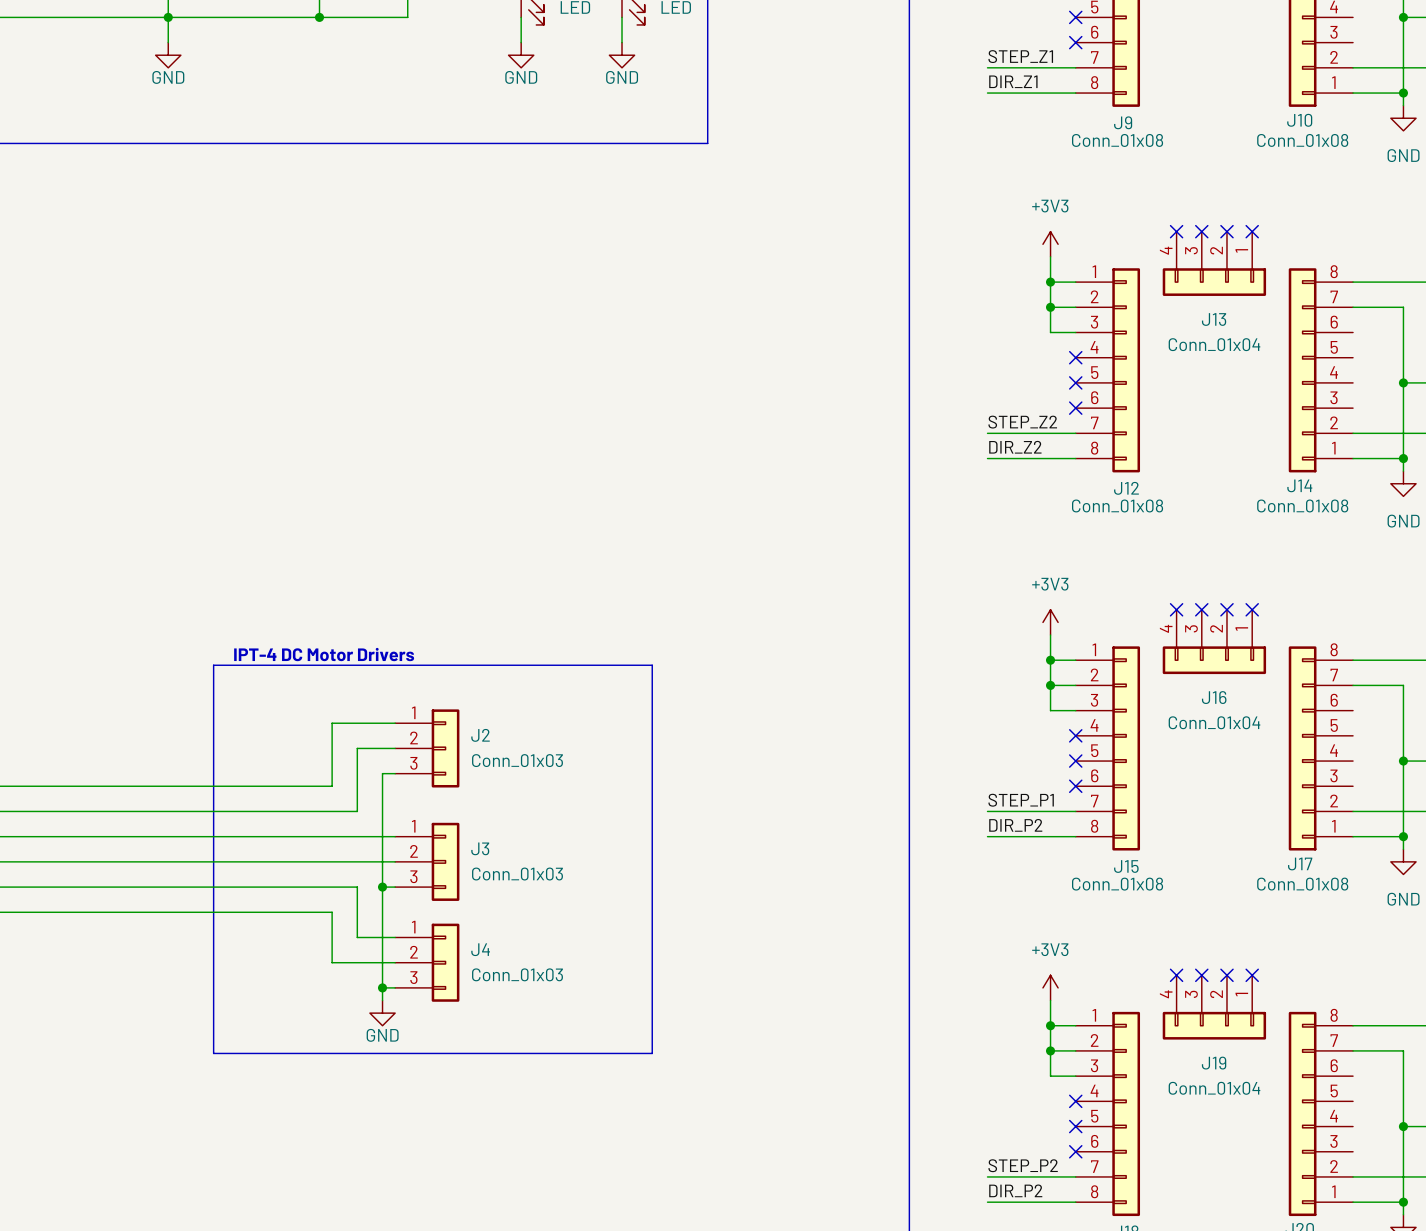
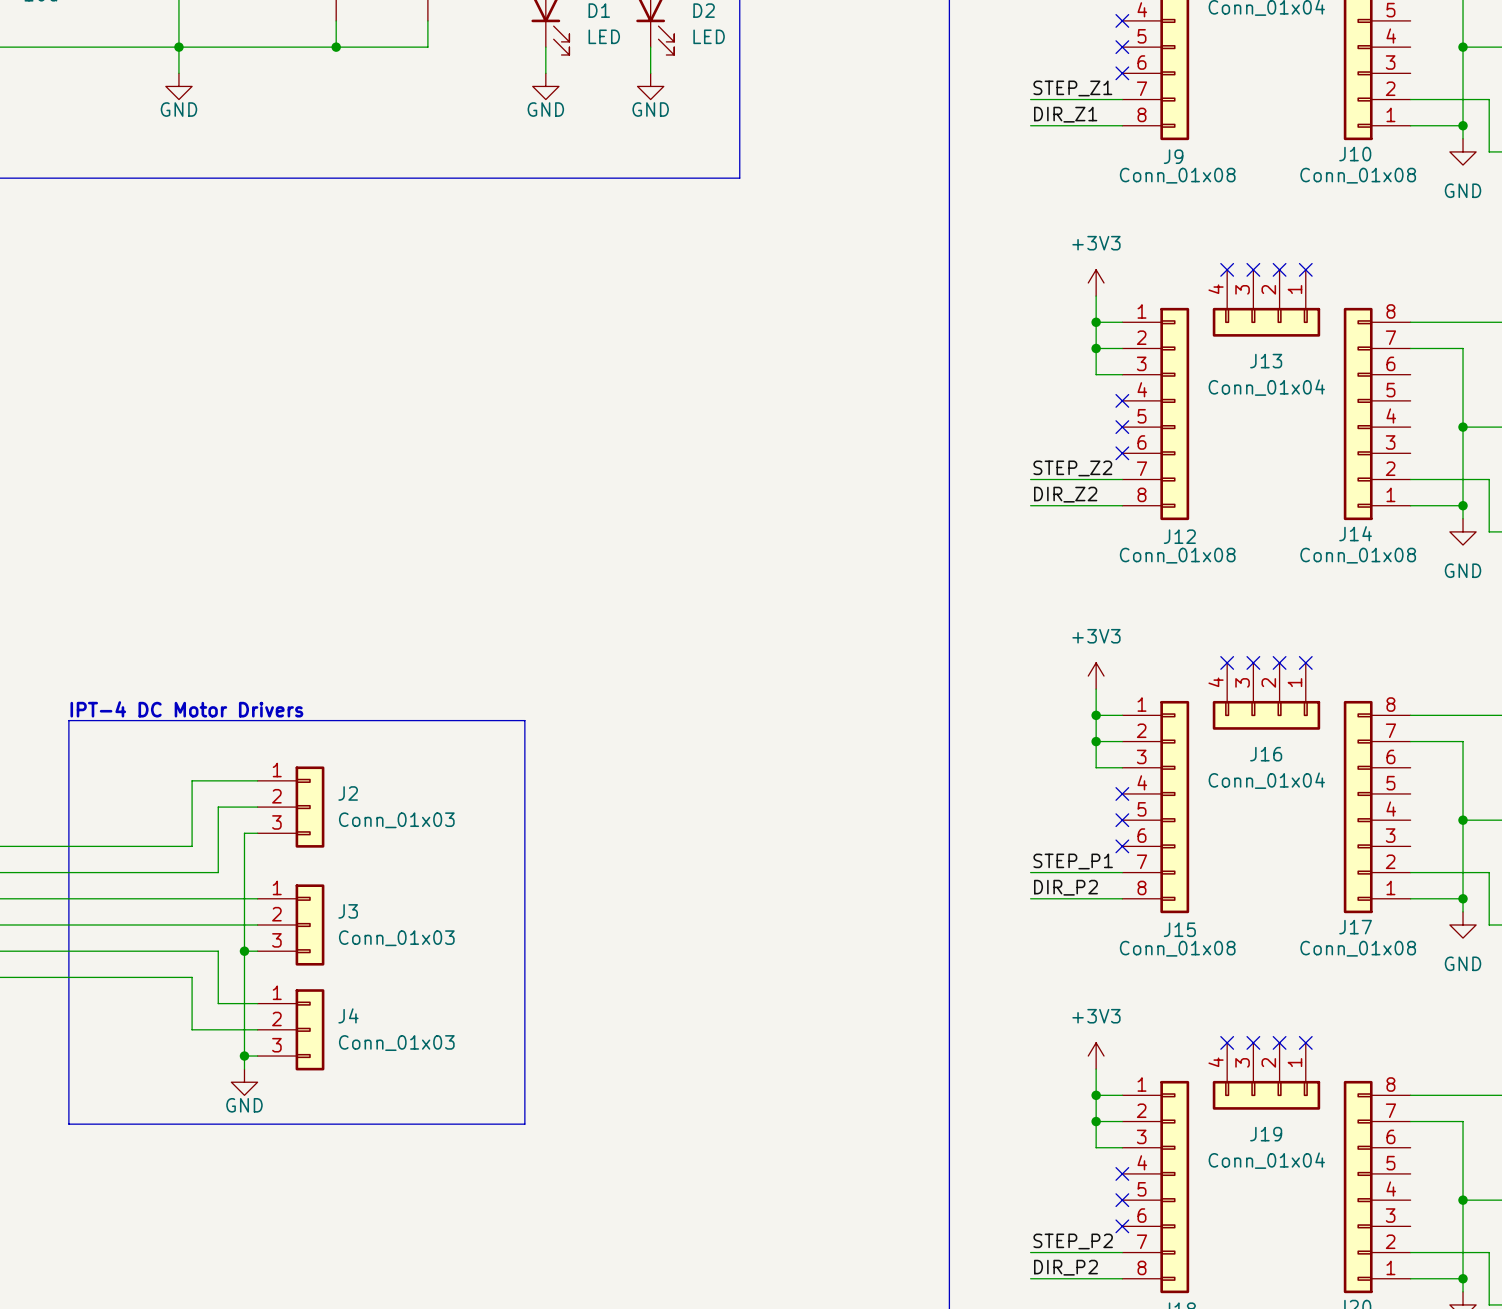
text position: IPT-4 DC Motor Drivers (324, 654) -> IPT-4 DC Motor Drivers (186, 709)
line: (213, 665) (213, 1053) -> (226, 720) (68, 720) (68, 1124) (226, 1124)
line: (501, 665) (652, 665) (652, 1053) (501, 1053) -> (524, 720) (524, 1124)
wire: (395, 723) (332, 723) (332, 786) (180, 786) -> (257, 780) (192, 780) (192, 846)
wire: (395, 748) (357, 748) (357, 811) (206, 811) -> (257, 807) (218, 807) (218, 872)
J2 position: (427, 748) -> (290, 807)
wire: (395, 773) (382, 773) (382, 1000) -> (257, 833) (244, 833) (244, 1069)
wire: (243, 836) (395, 836) -> none
wire: (243, 861) (395, 861) -> none
J3 position: (427, 861) -> (290, 924)
wire: (206, 887) (231, 887) -> (218, 951) (218, 1003) (257, 1003)
junction: none -> (244, 951)
wire: (243, 887) (357, 887) (357, 937) (395, 937) -> none
wire: (382, 887) (395, 887) -> none
junction: (382, 887) -> none
wire: (180, 912) (332, 912) (332, 962) (395, 962) -> (192, 977) (192, 1029) (257, 1029)
J4 position: (427, 962) -> (290, 1029)
junction: none -> (244, 1056)
wire: (382, 987) (395, 987) -> (244, 1056) (257, 1056)
junction: (382, 987) -> none
power symbol position: GND (382, 1013) -> GND (244, 1082)

